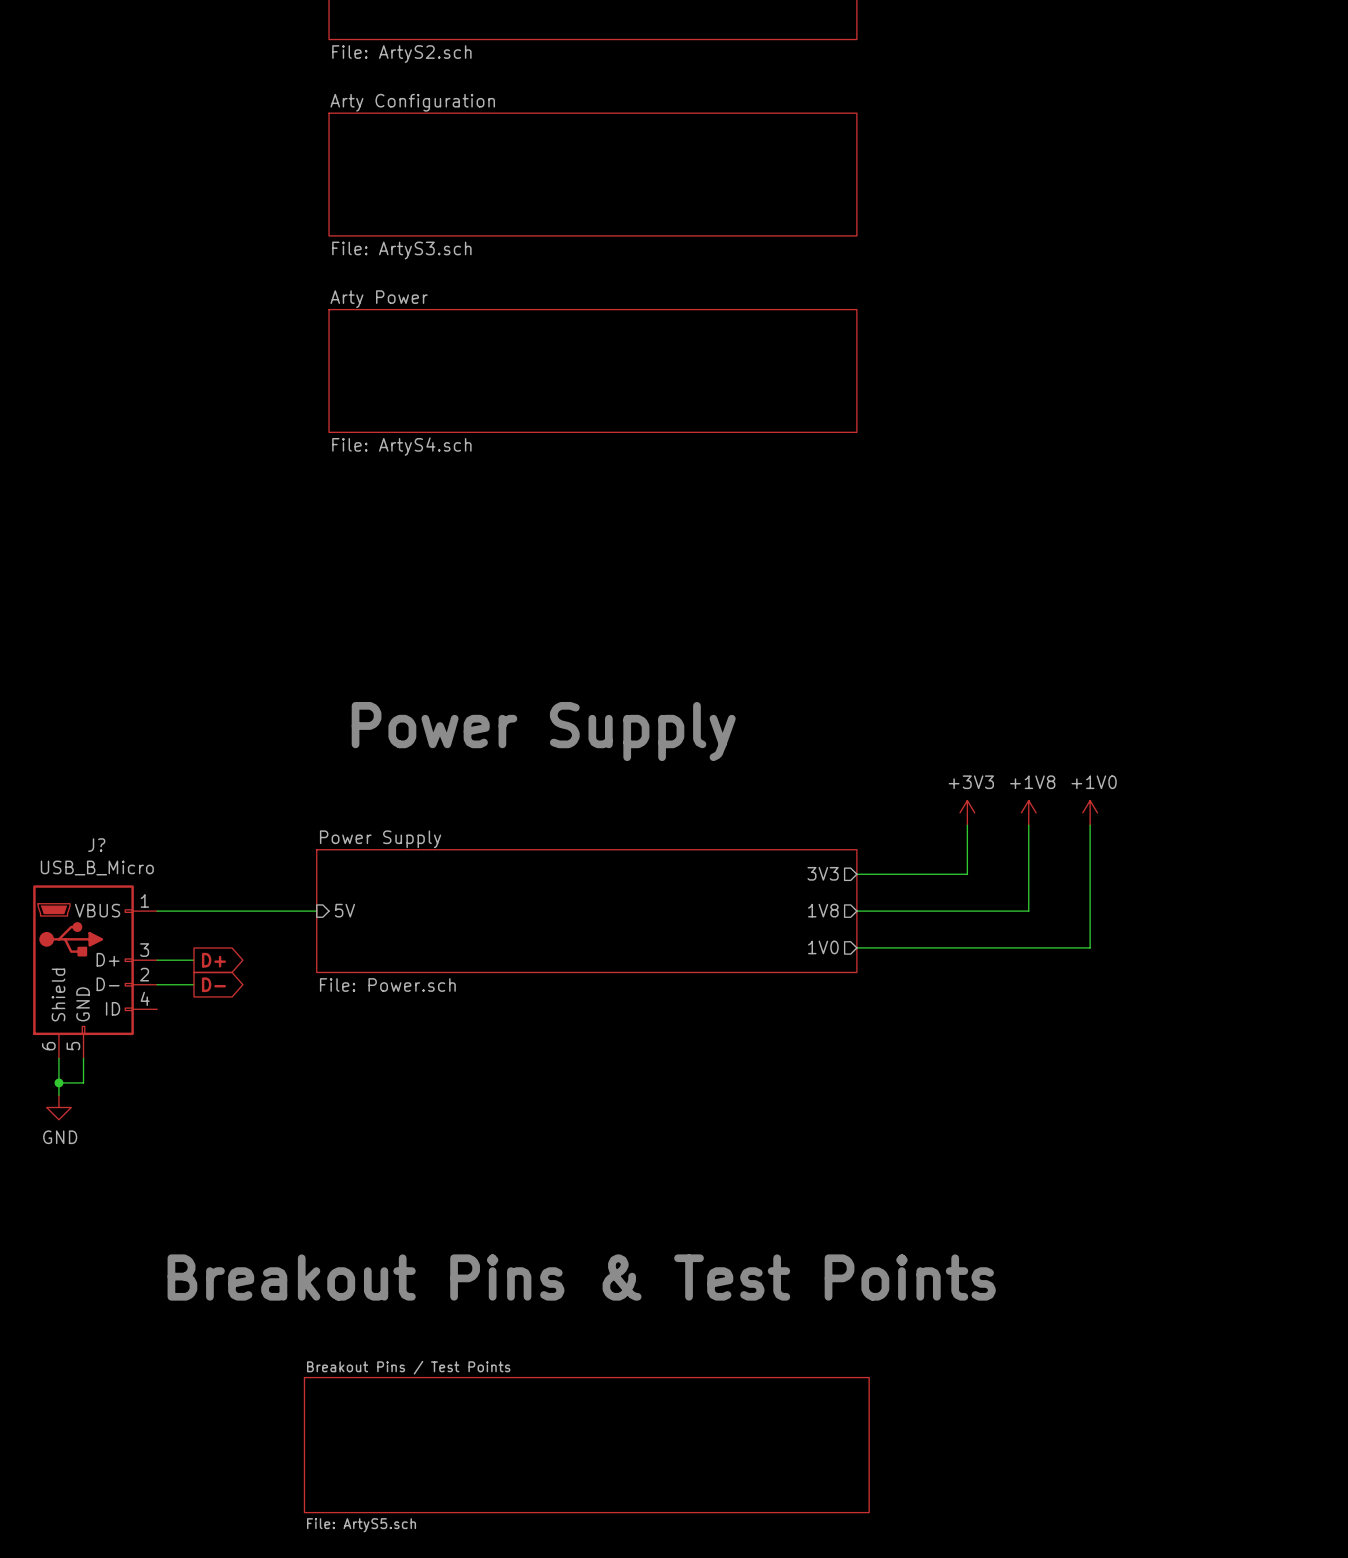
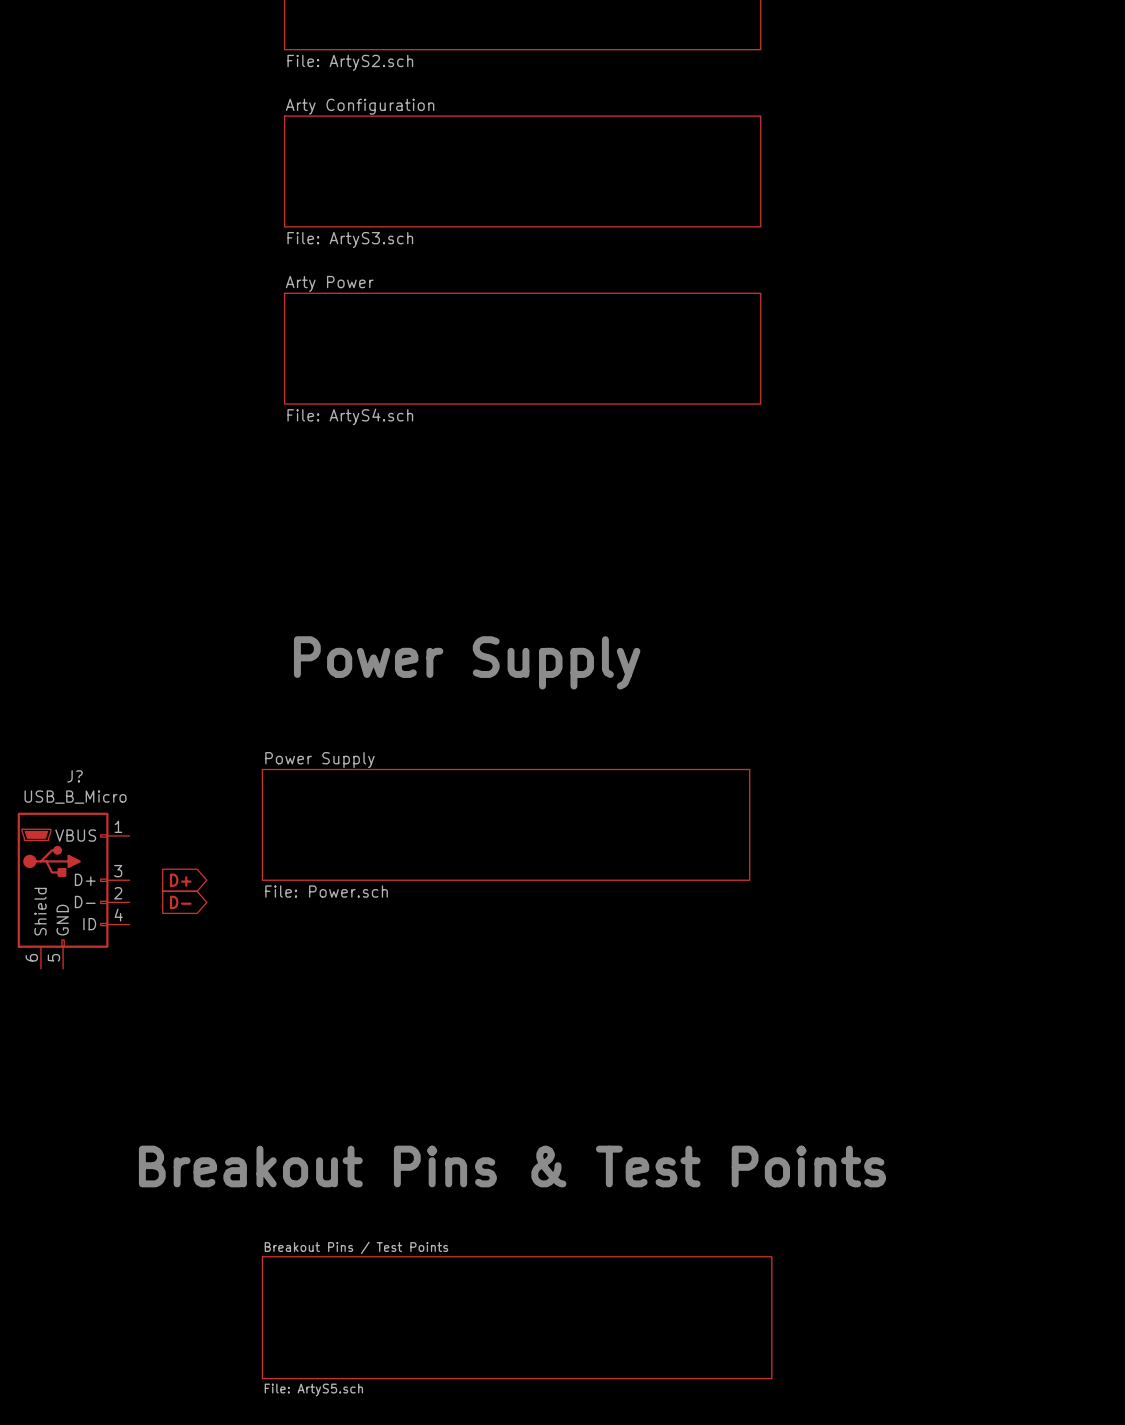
text position: Power Supply (543, 731) -> Power Supply (467, 662)
power symbol: +3V3 (967, 812) -> none
power symbol: +1V8 (1028, 812) -> none
power symbol: +1V0 (1090, 812) -> none
wire: (967, 825) (967, 874) (856, 874) -> none
wire: (1028, 825) (1028, 911) (856, 911) -> none
wire: (1090, 825) (1090, 947) (856, 947) -> none
sheet pin: 3V3 (823, 873) -> none
sheet pin: 5V (345, 910) -> none
sheet pin: 1V8 (823, 910) -> none
wire: (157, 911) (316, 911) -> none
sheet Power Supply position: (586, 911) -> (506, 824)
sheet pin: 1V0 (823, 947) -> none
wire: (157, 960) (193, 960) -> none
wire: (157, 984) (193, 984) -> none
wire: (58, 1058) (58, 1095) -> none
wire: (83, 1058) (83, 1082) (58, 1082) -> none
junction: (58, 1082) -> none
power symbol: GND (58, 1107) -> none

